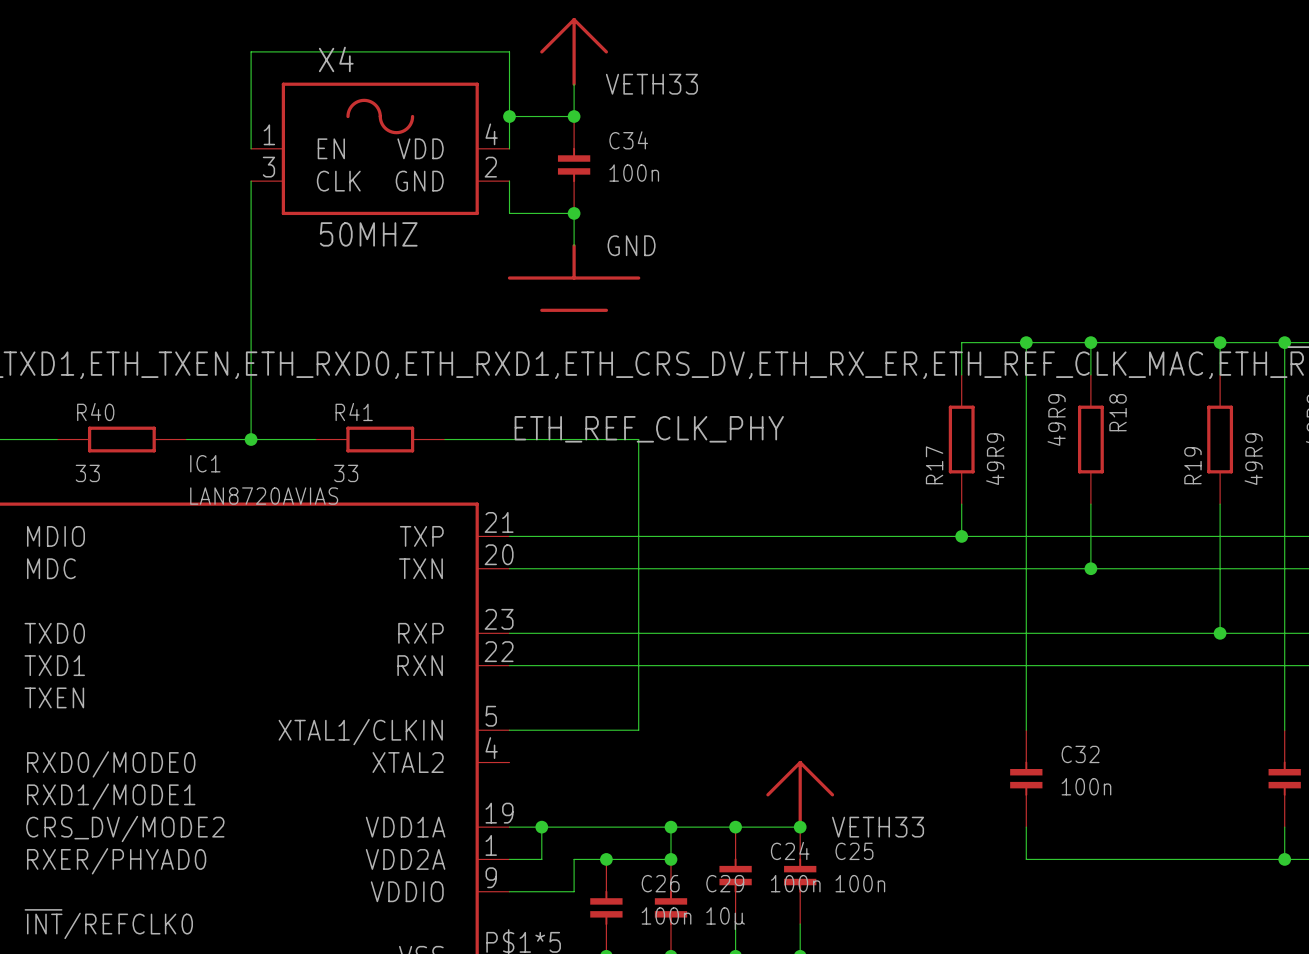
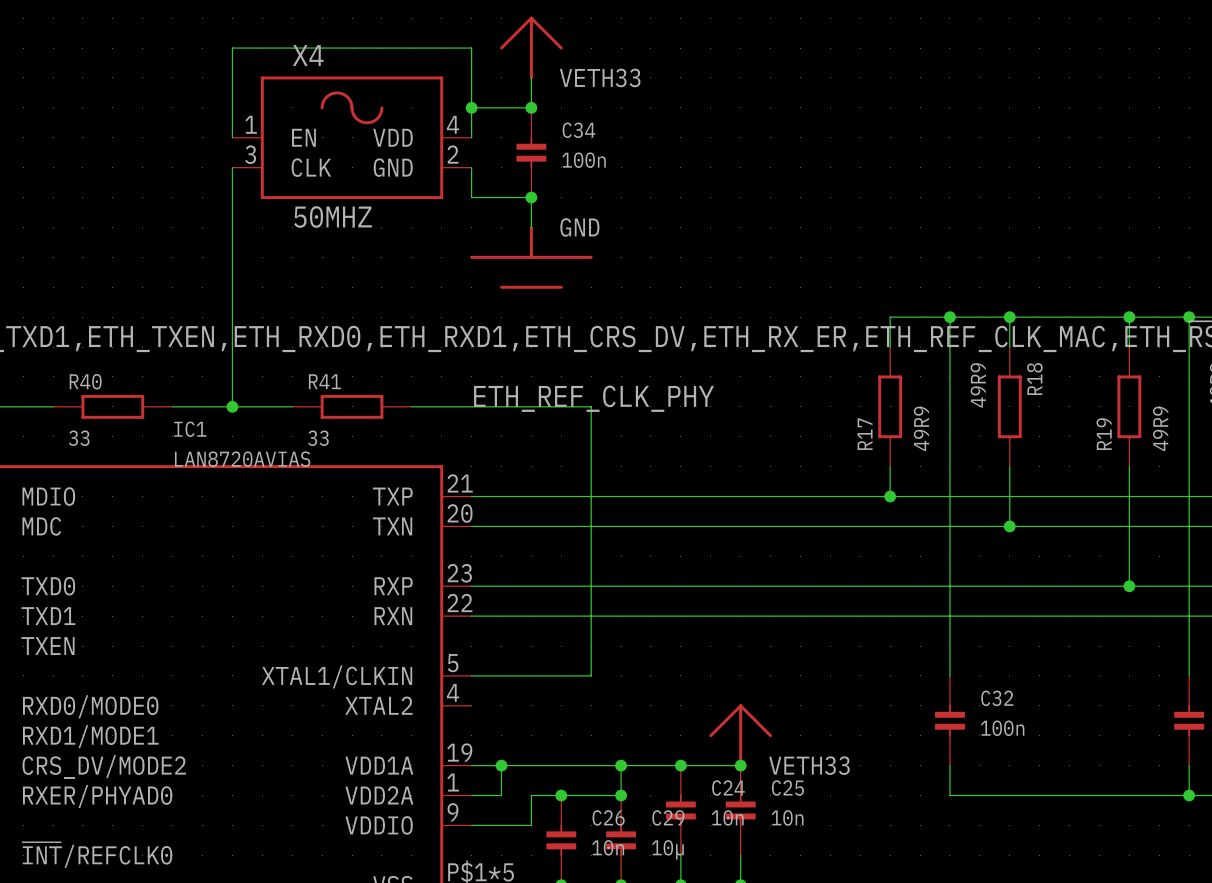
C24 value: 100n (795, 883) -> 10n (727, 817)
C25 value: 100n (860, 883) -> 10n (787, 817)
C26 value: 100n (666, 915) -> 10n (608, 847)

